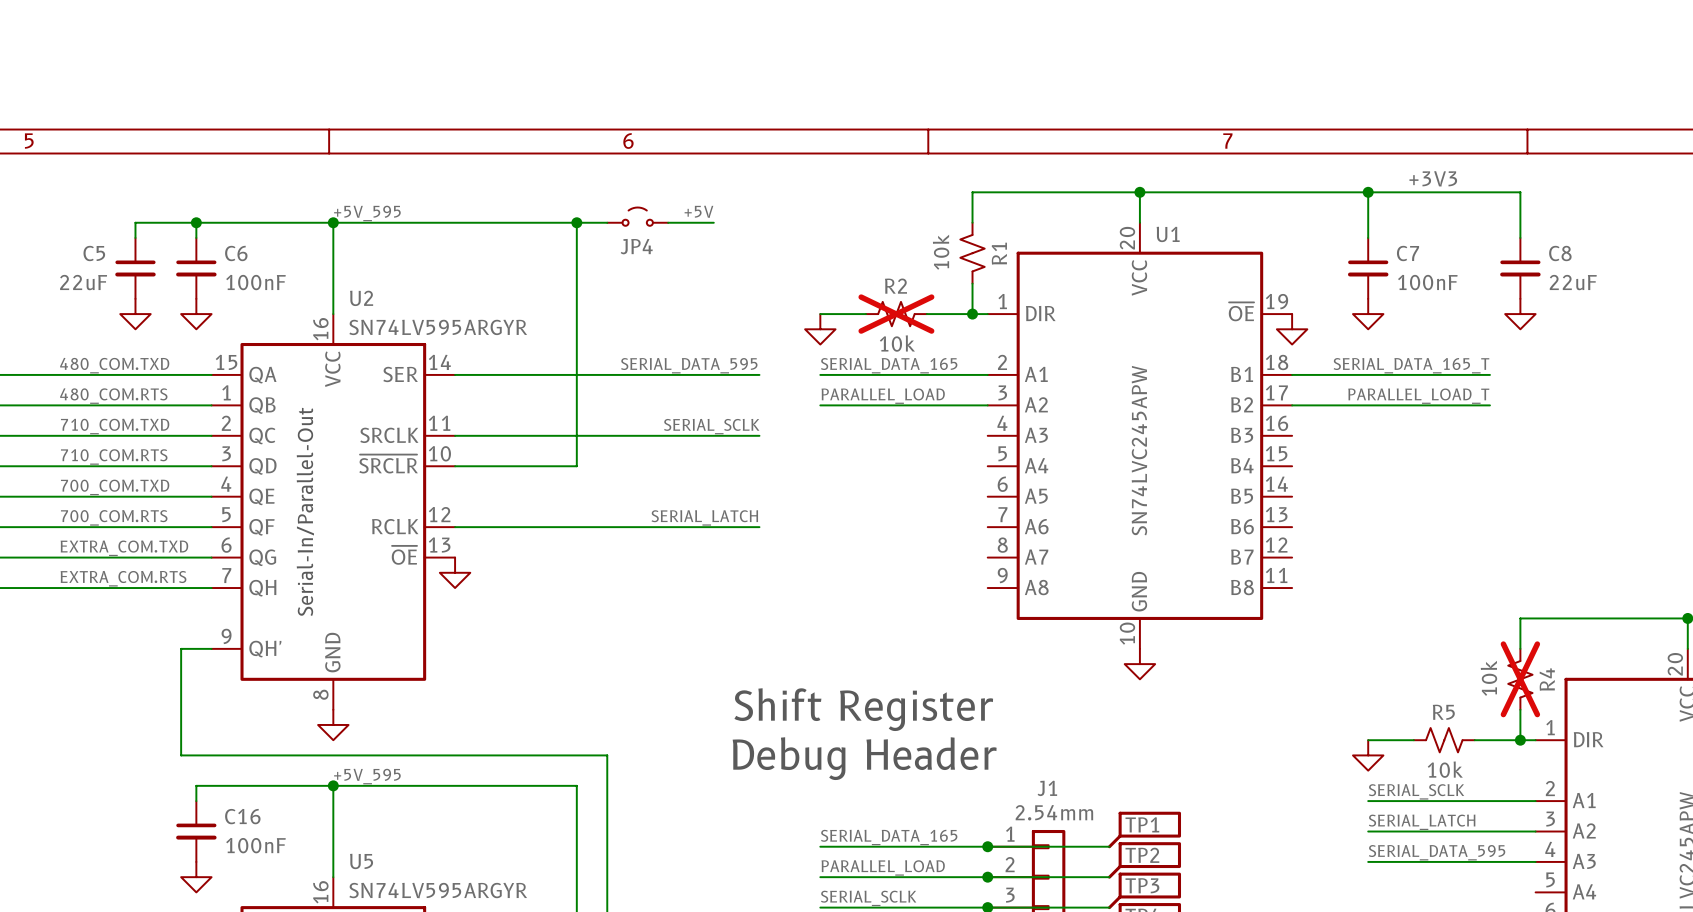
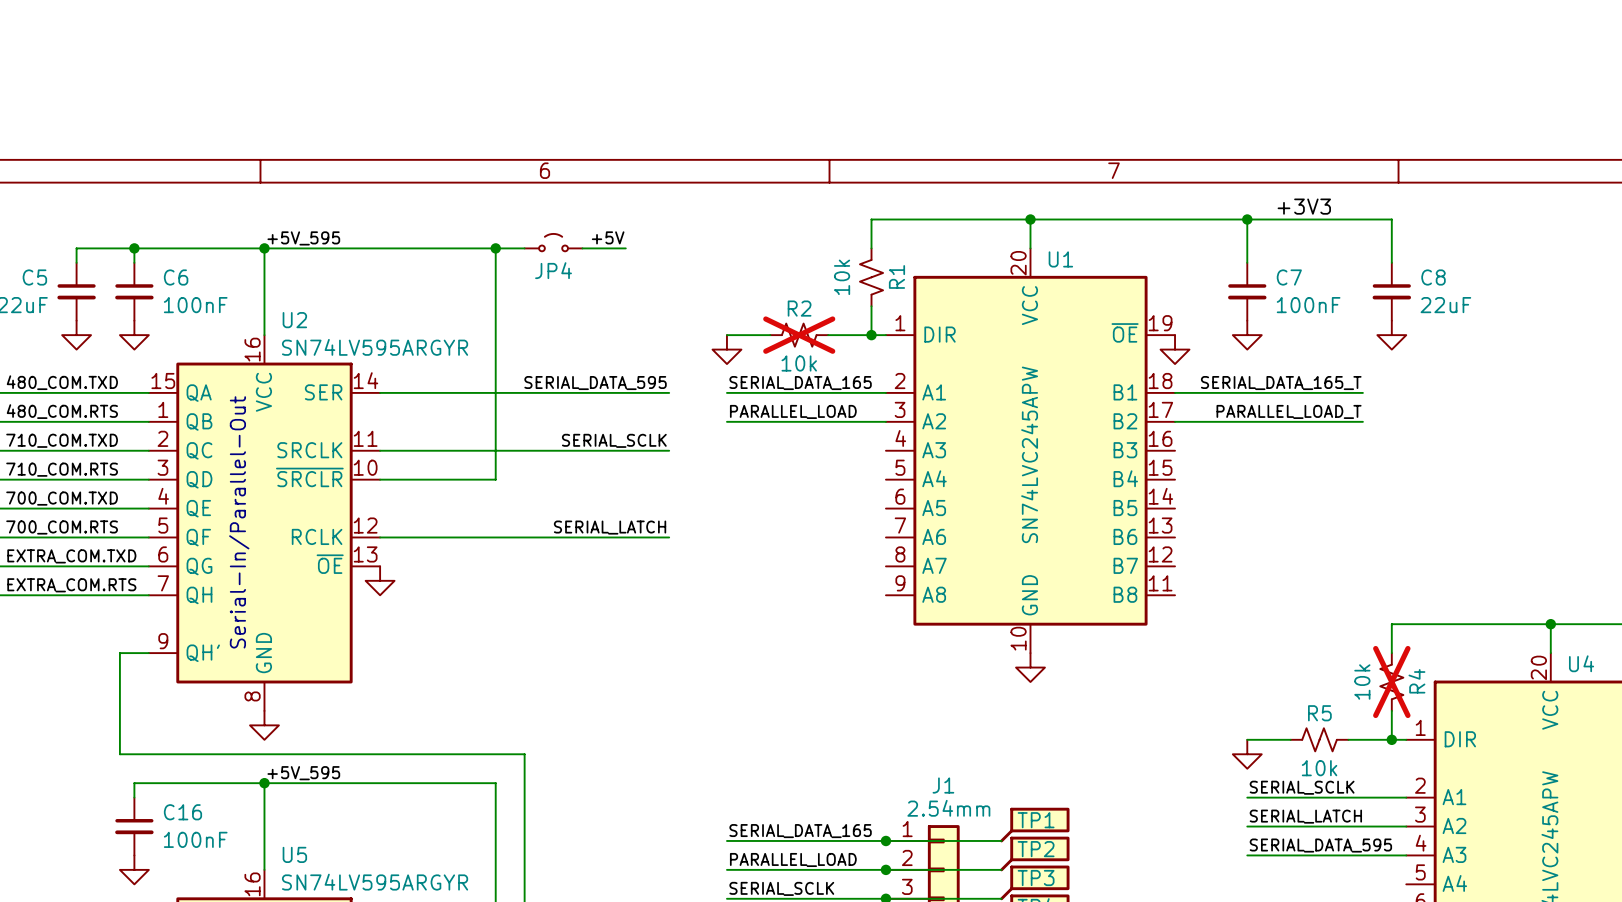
text: Shift Register (863, 709) -> none
text: Debug Header (864, 758) -> none

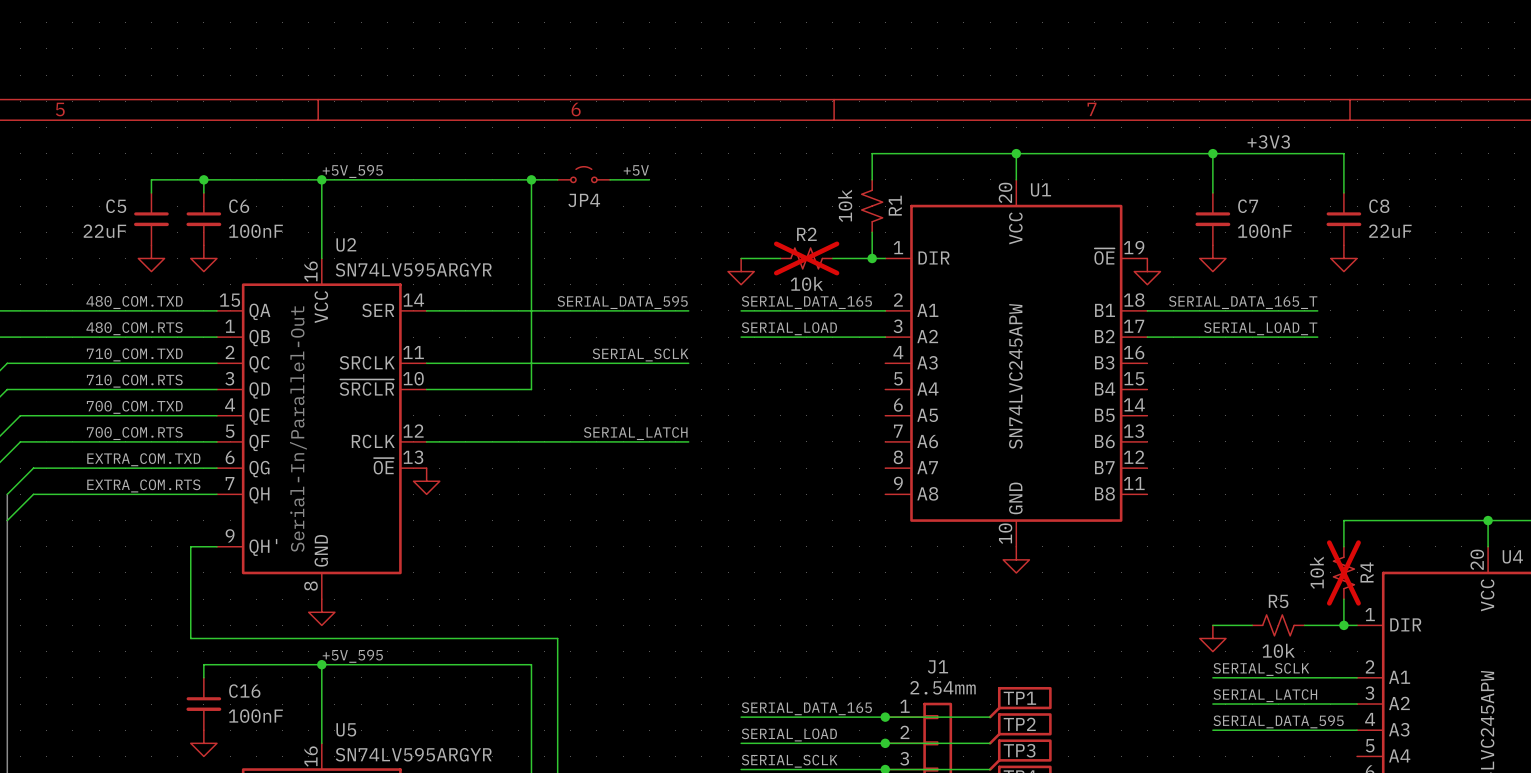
label: PARALLEL_LOAD (793, 411) -> SERIAL_LOAD (789, 328)
label: PARALLEL_LOAD_T (1289, 411) -> SERIAL_LOAD_T (1260, 328)
label: PARALLEL_LOAD (793, 859) -> SERIAL_LOAD (789, 735)

